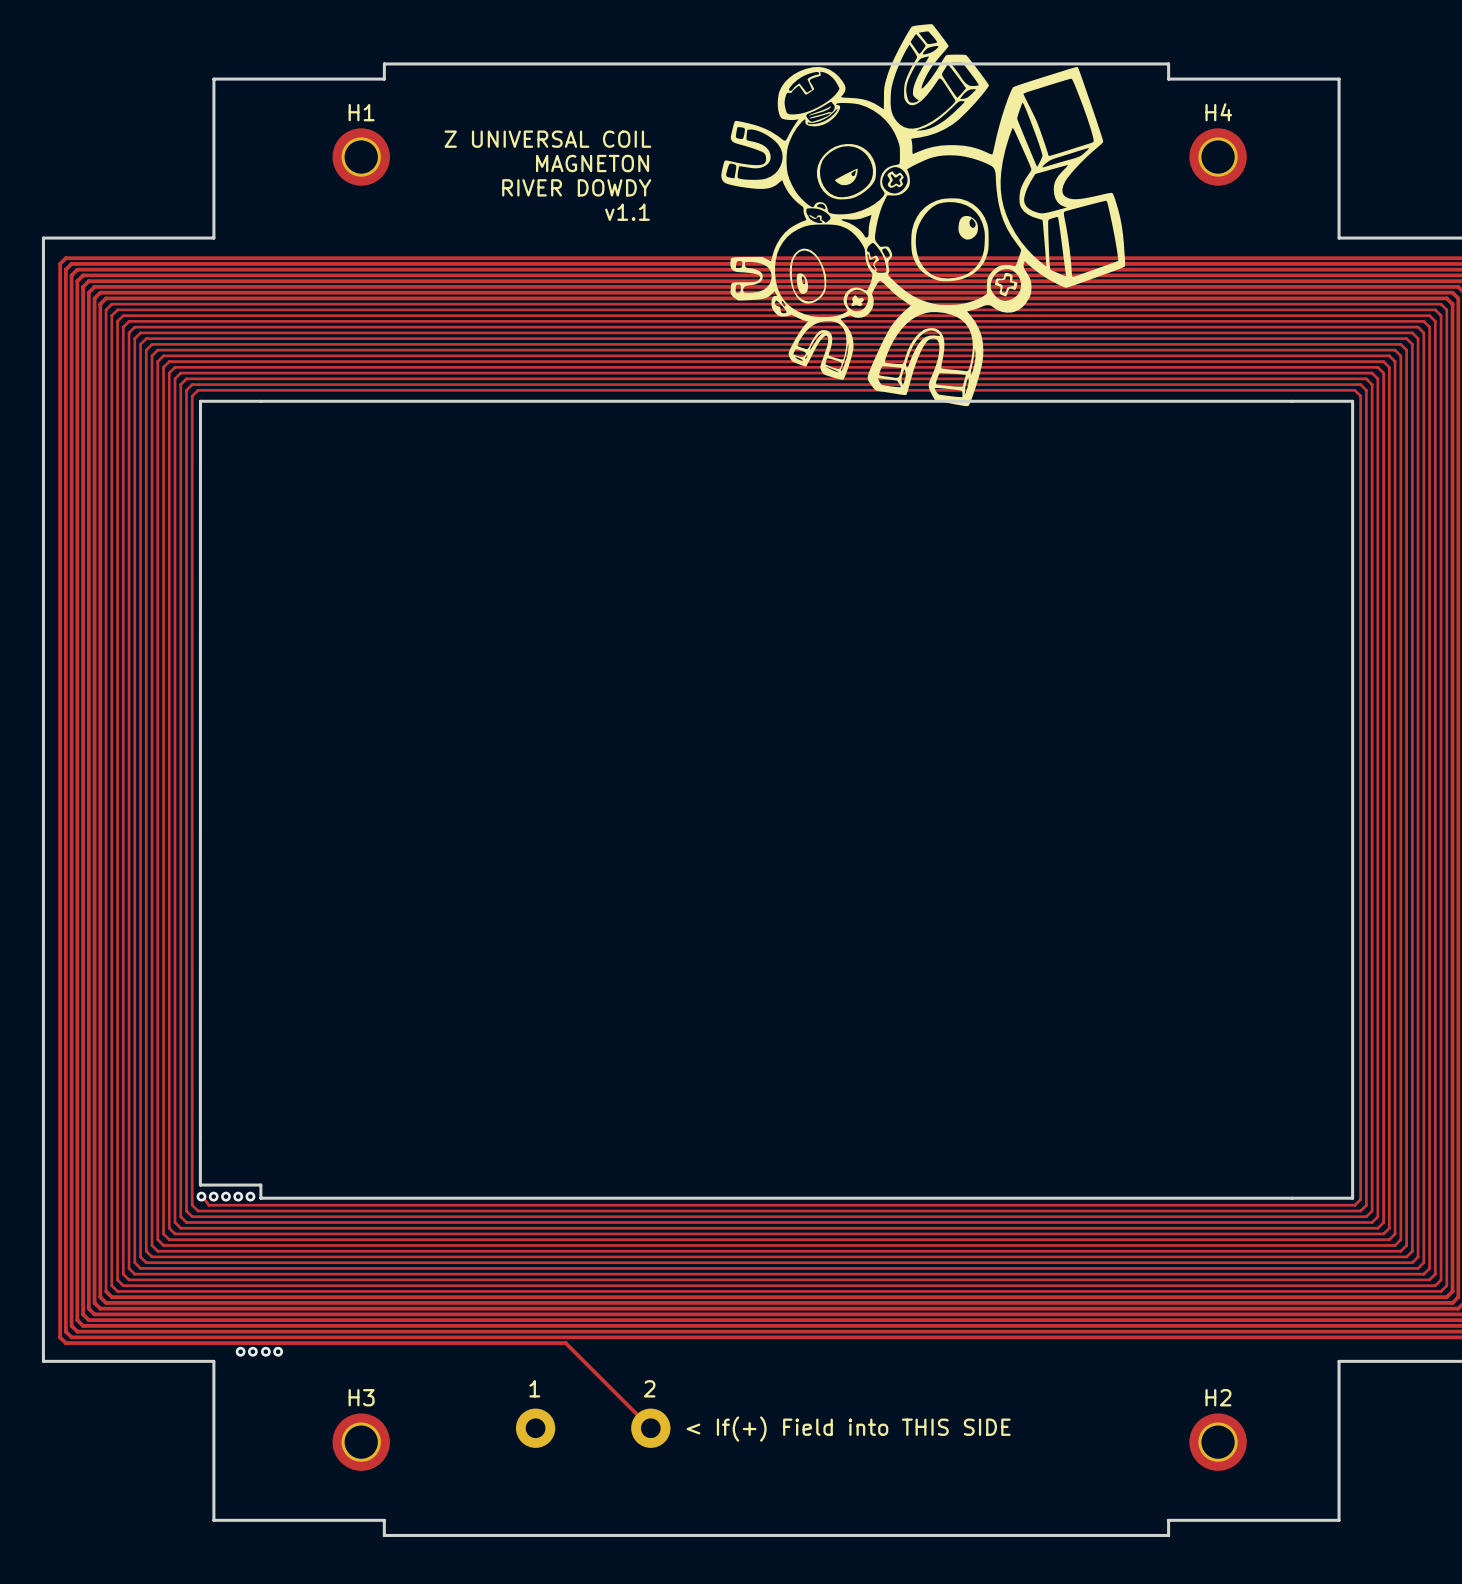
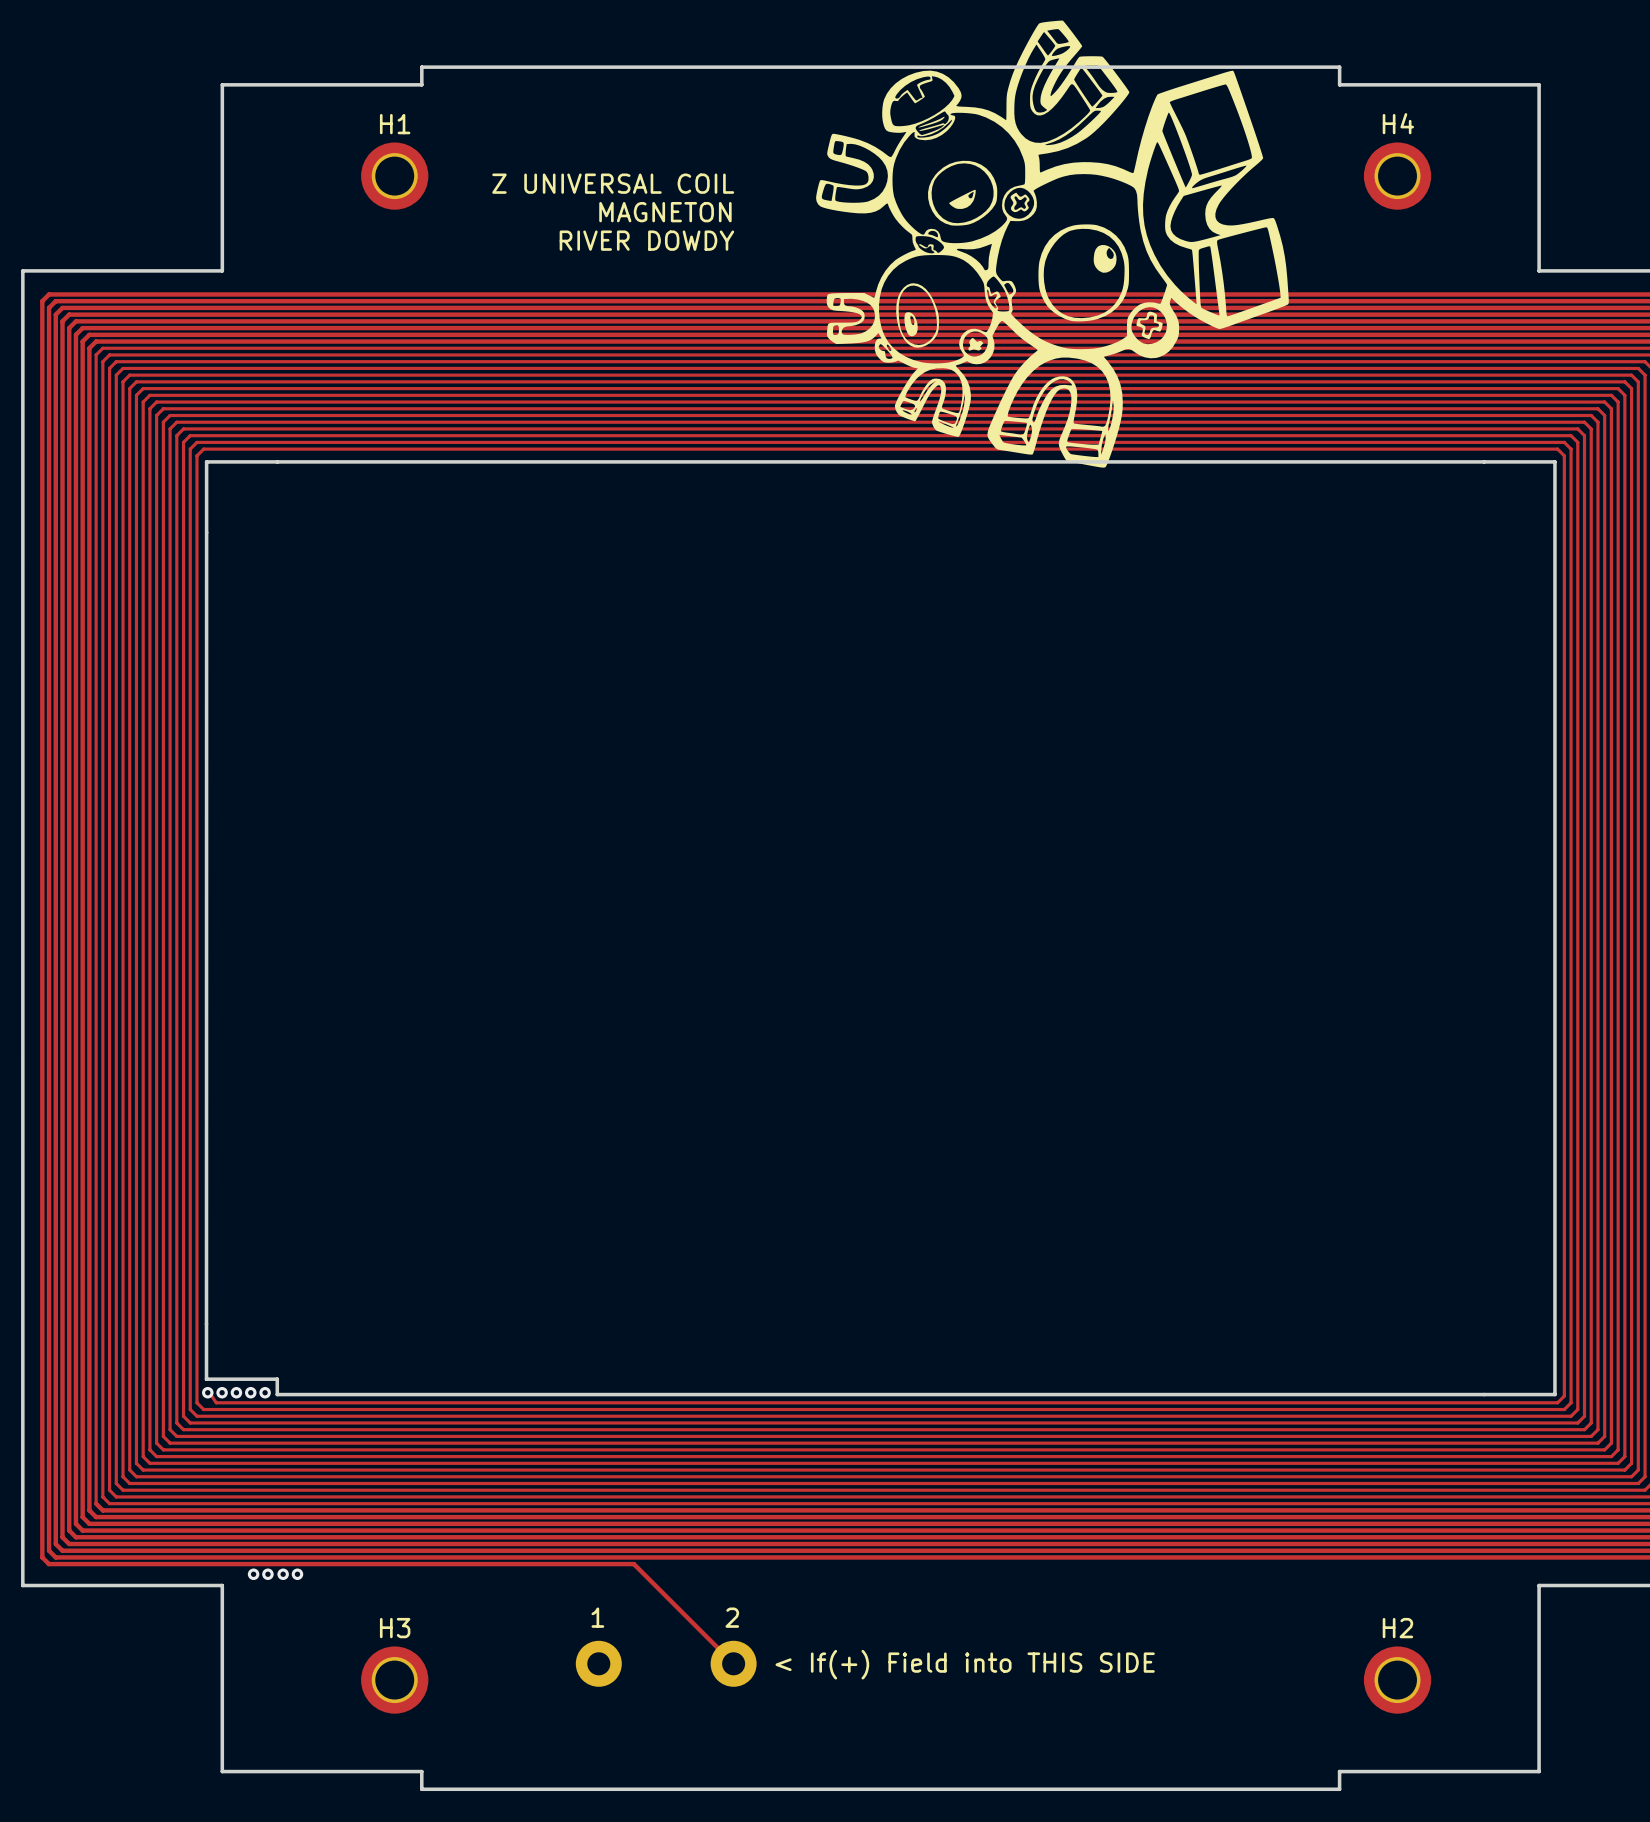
text: Z UNIVERSAL COIL (547, 139) -> none
text: MAGNETON (592, 163) -> Z UNIVERSAL COIL (613, 183)
text: RIVER DOWDY (576, 187) -> MAGNETON (665, 212)
text: v1.1 (627, 212) -> RIVER DOWDY (646, 240)

